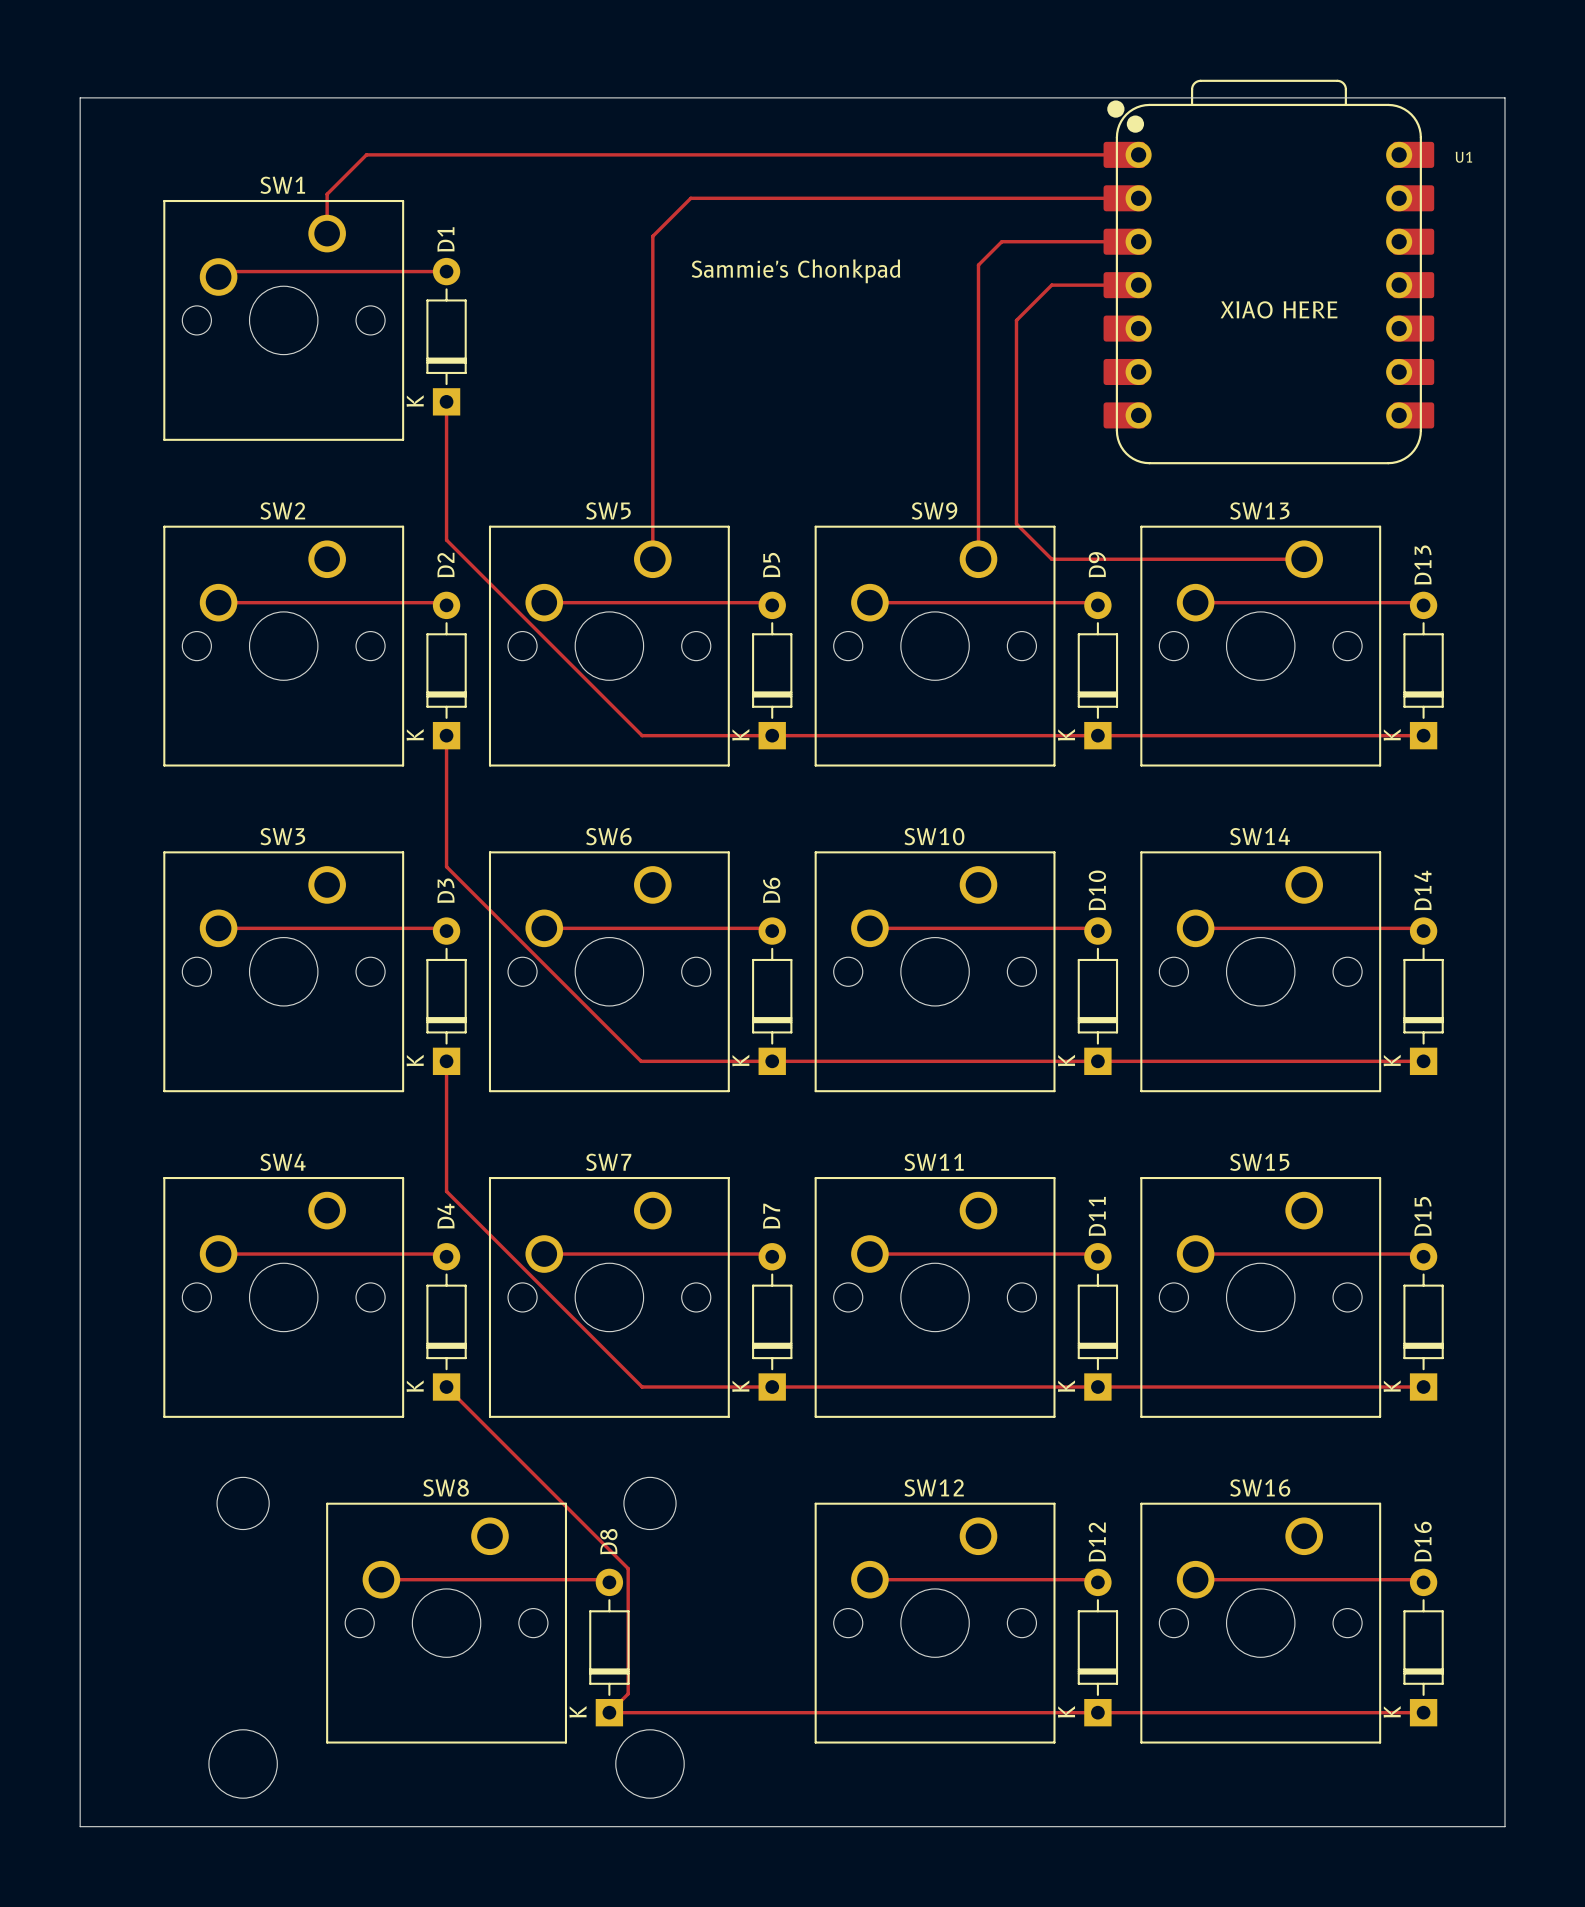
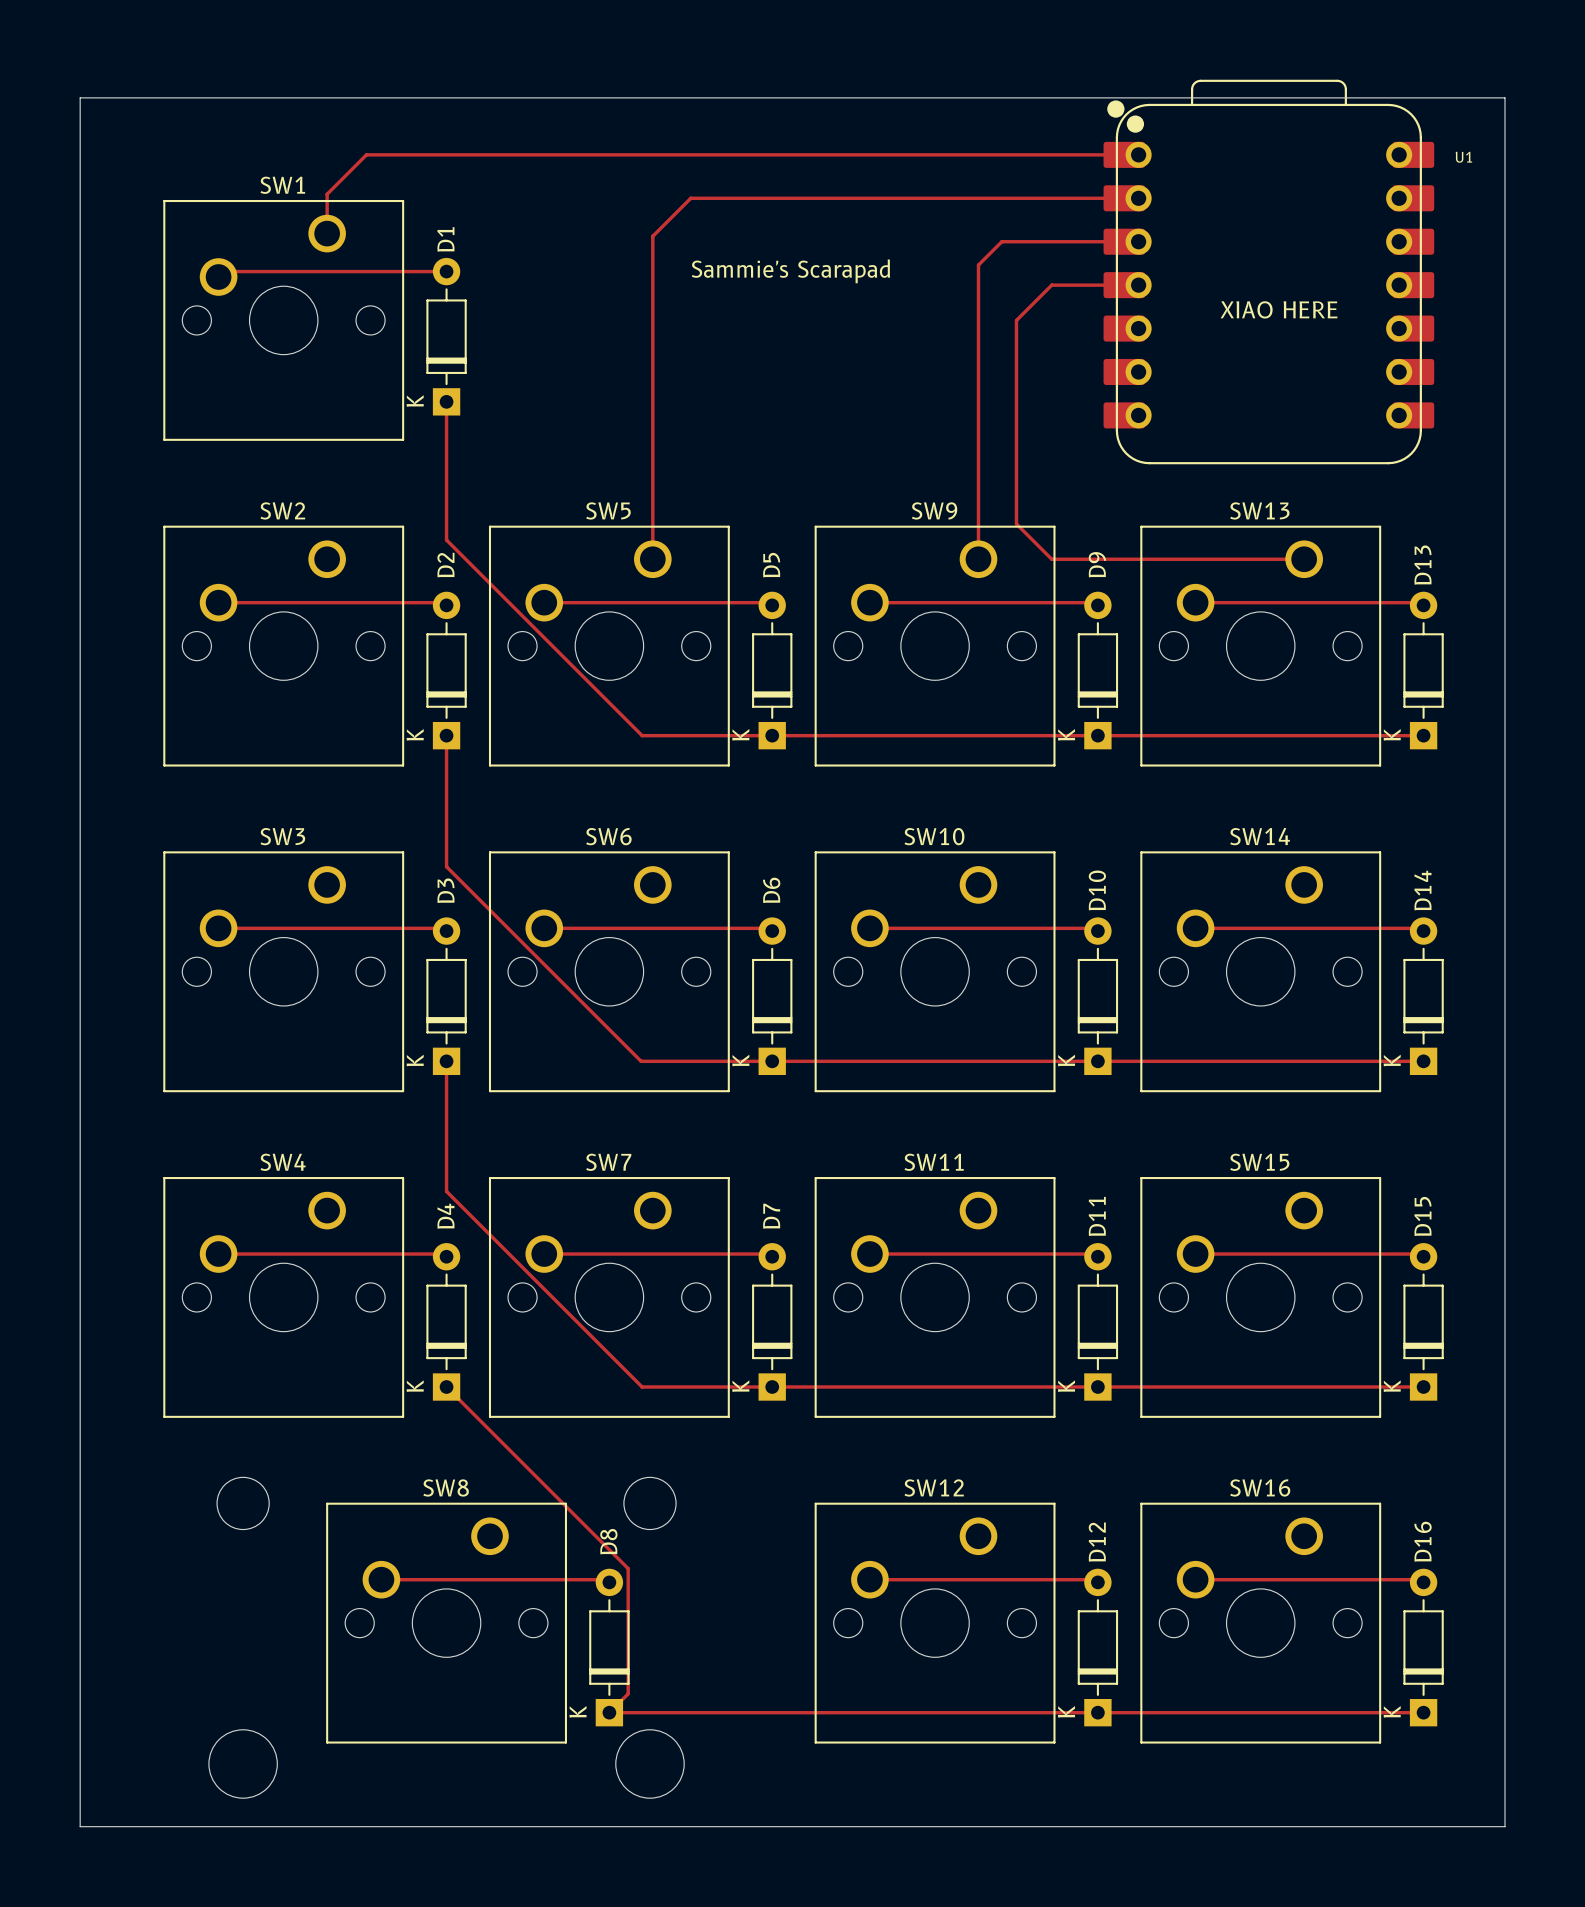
text: Sammie's Chonkpad (795, 271) -> Sammie's Scarapad (790, 271)

